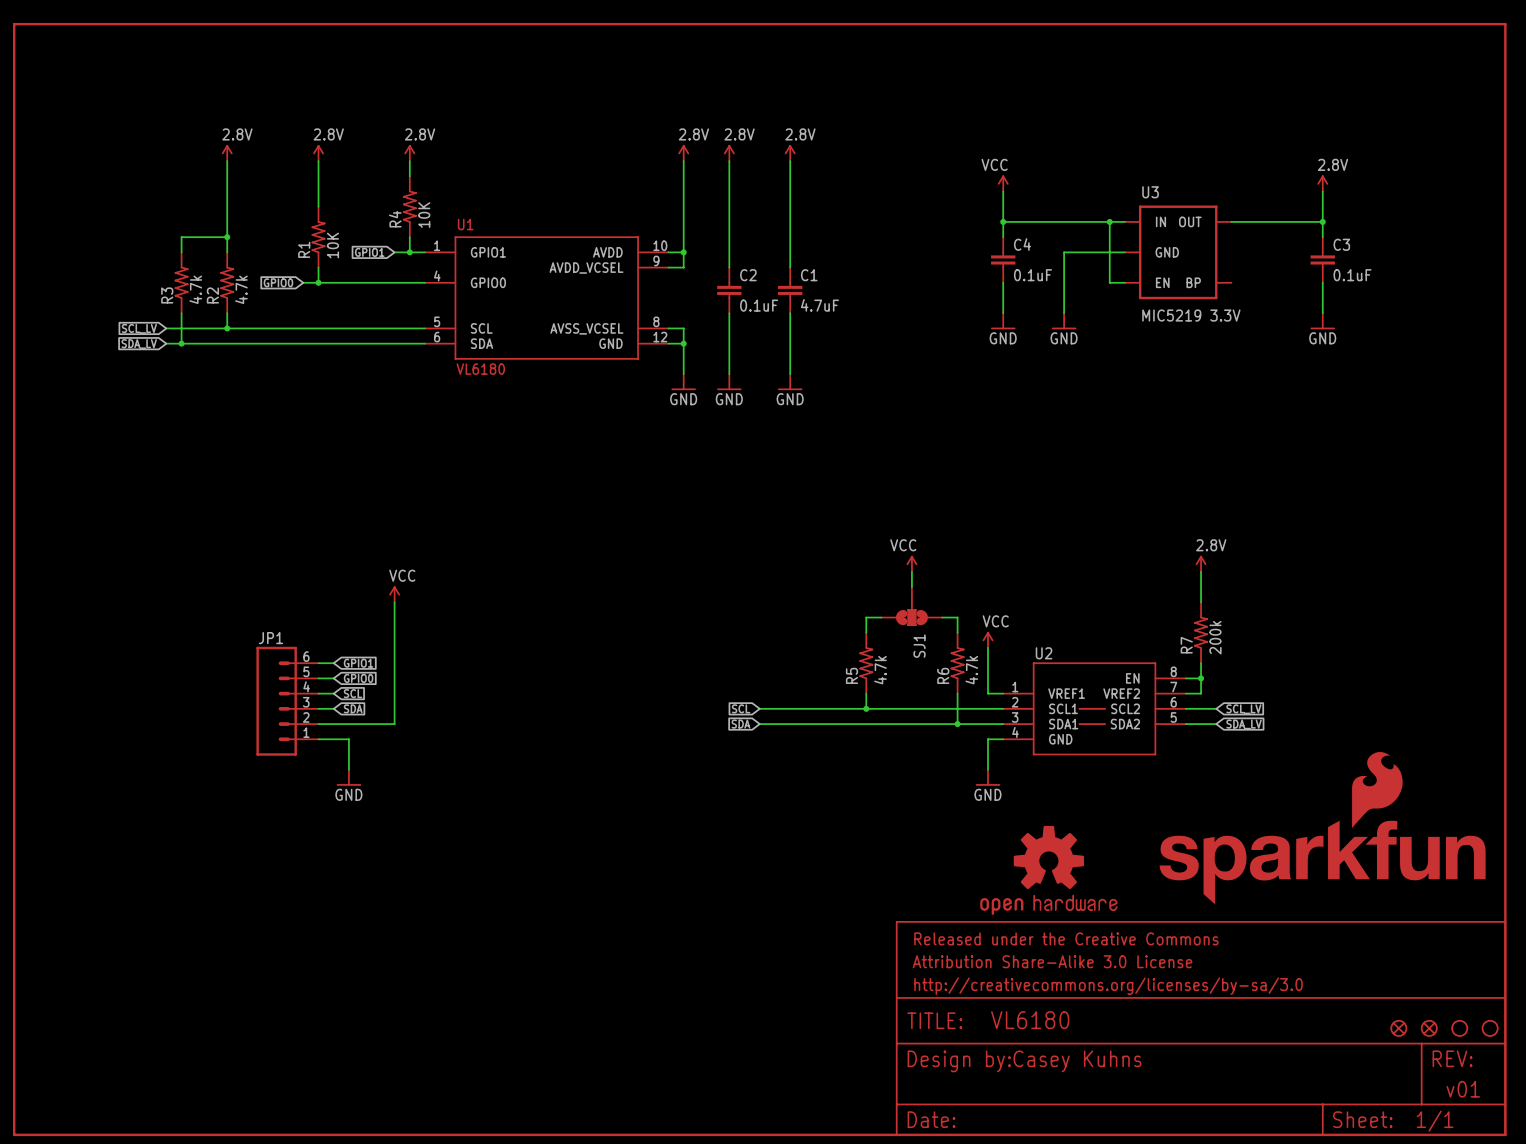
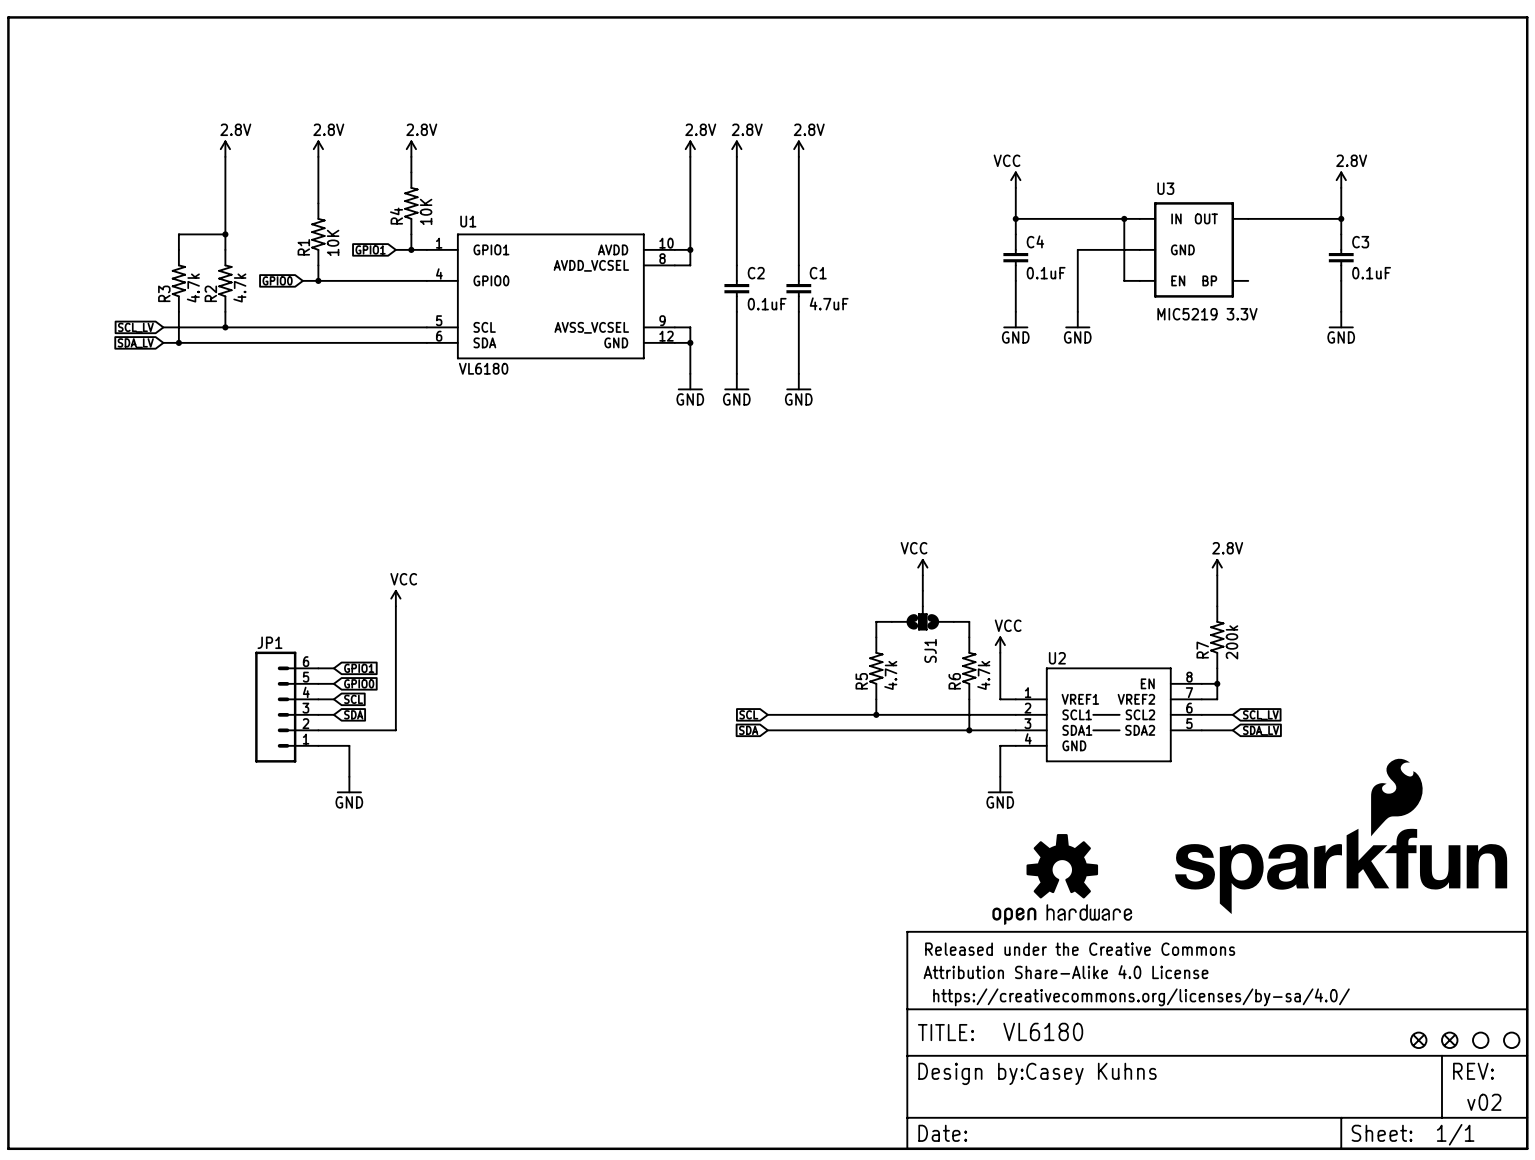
U1 pin number: 9 (656, 261) -> 8 (662, 258)
U1 pin number: 8 (656, 321) -> 9 (662, 320)
part text: Attribution Share-Alike 3.0 License (1052, 961) -> Attribution Share-Alike 4.0 License (1066, 972)
part text: http://creativecommons.org/licenses/by-sa/3.0 (1108, 986) -> https://creativecommons.org/licenses/by-sa/4.0/ (1141, 997)
text: v01 (1463, 1089) -> v02 (1484, 1102)

